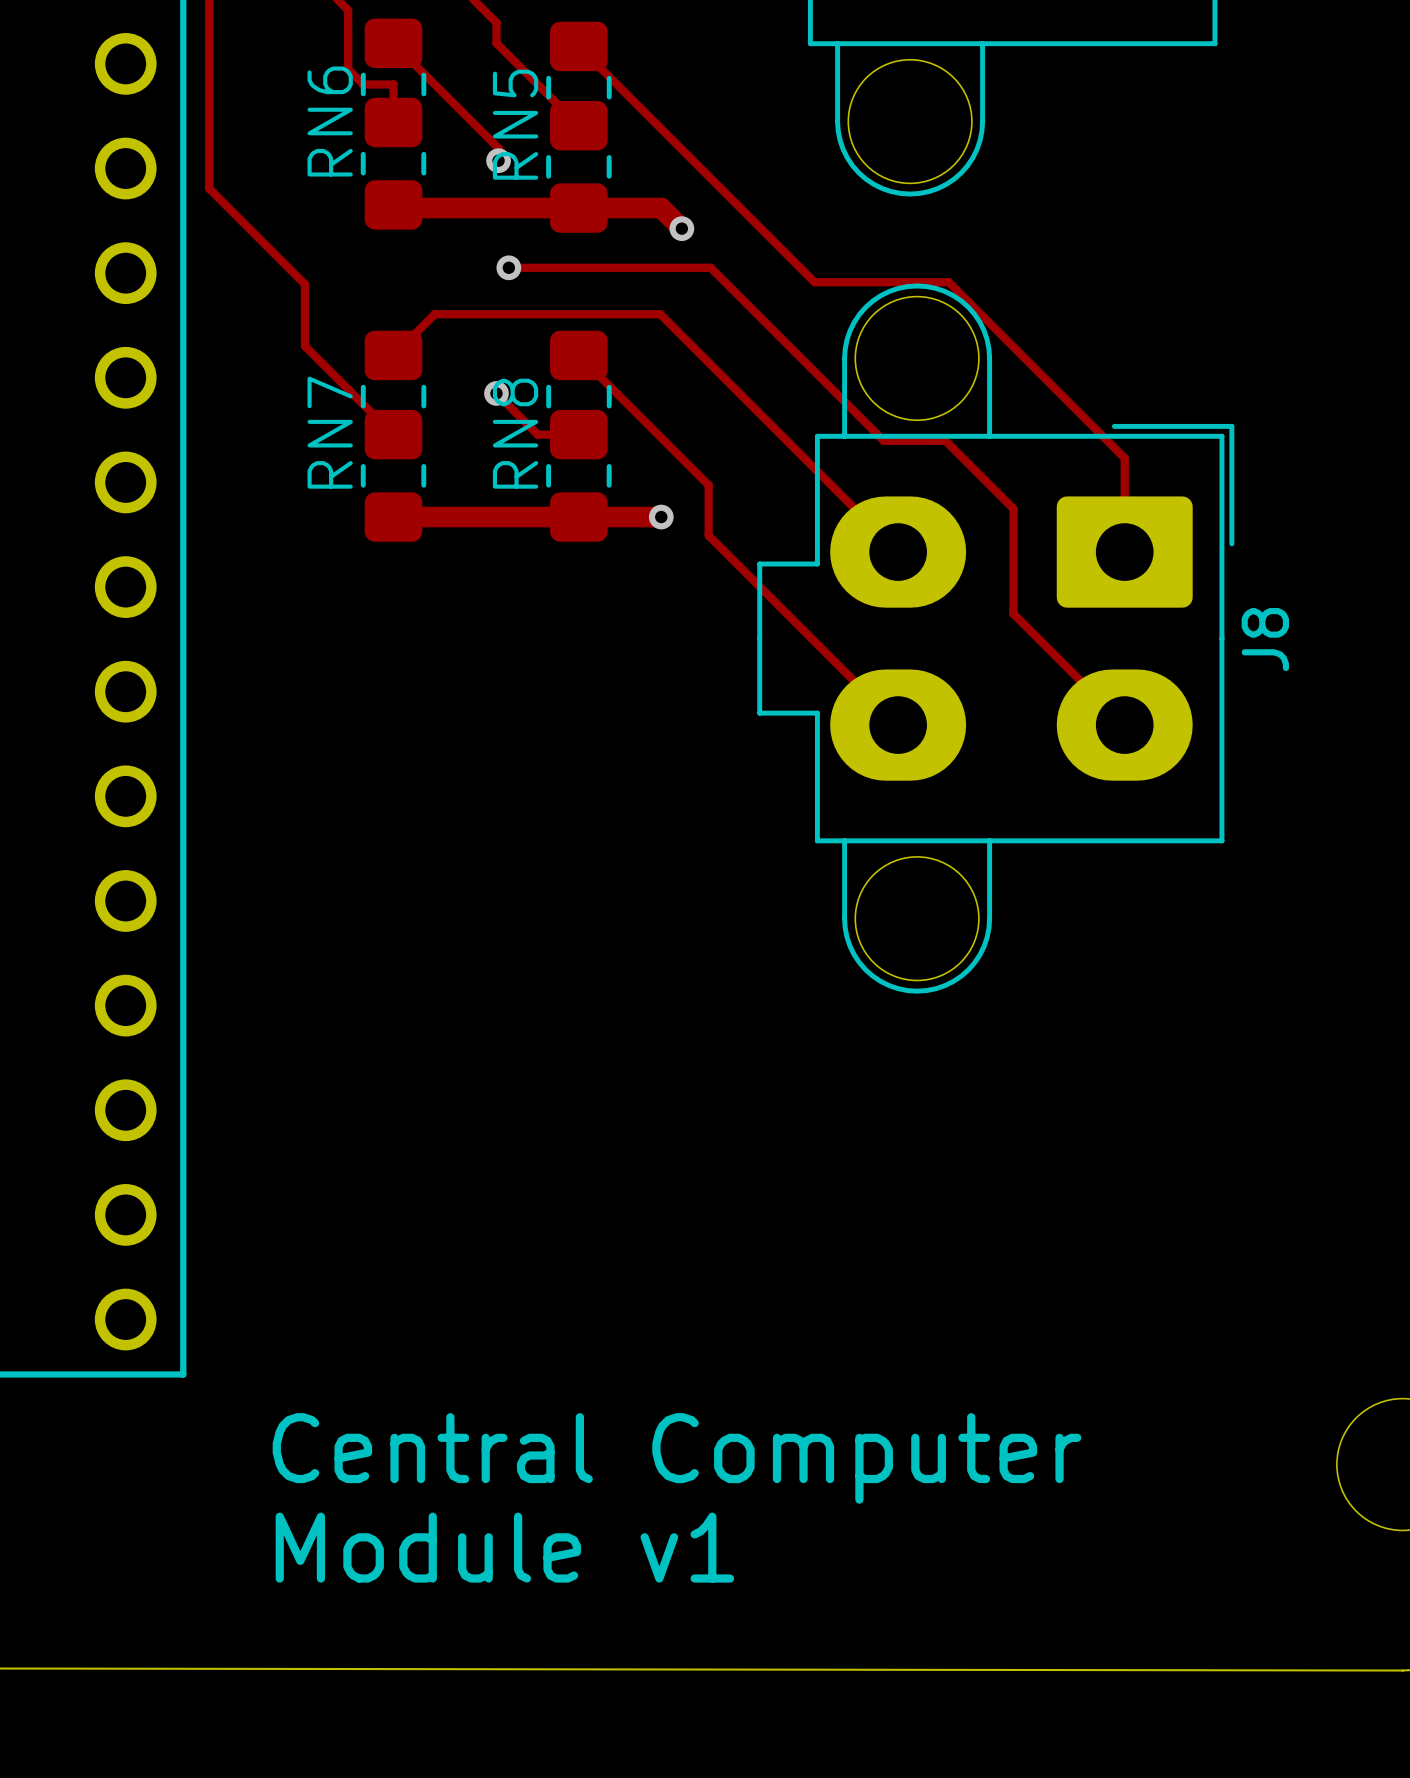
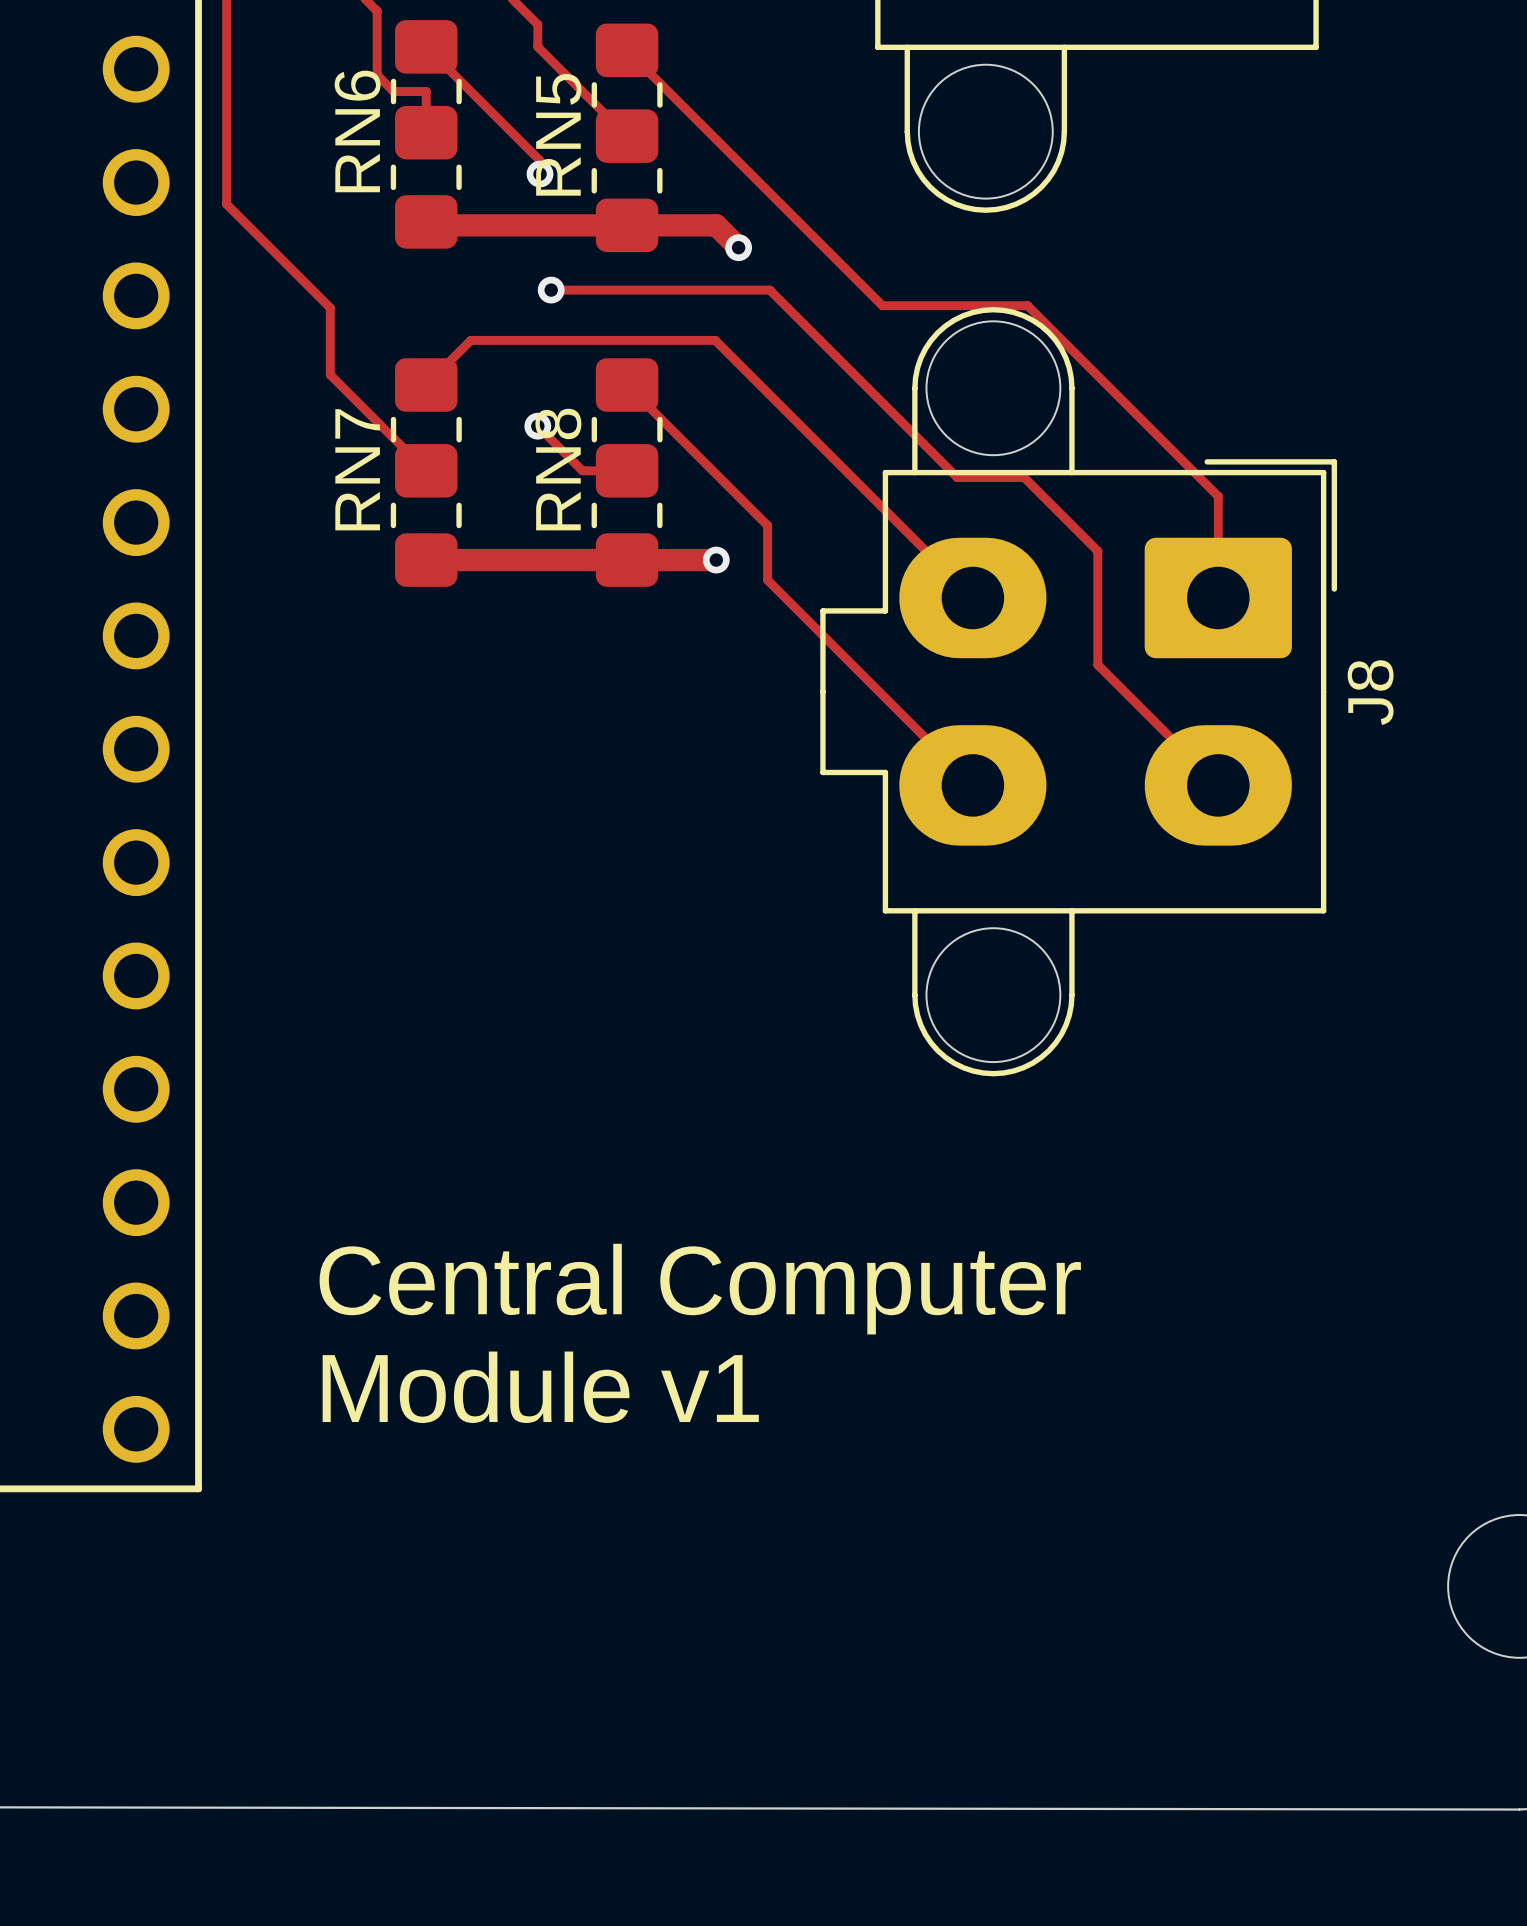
text position: Central Computer (676, 1458) -> Central Computer (700, 1289)
text position: Module v1 (504, 1547) -> Module v1 (540, 1387)

